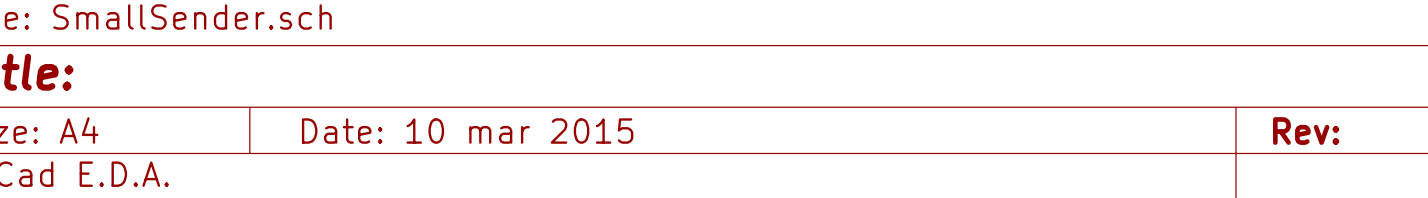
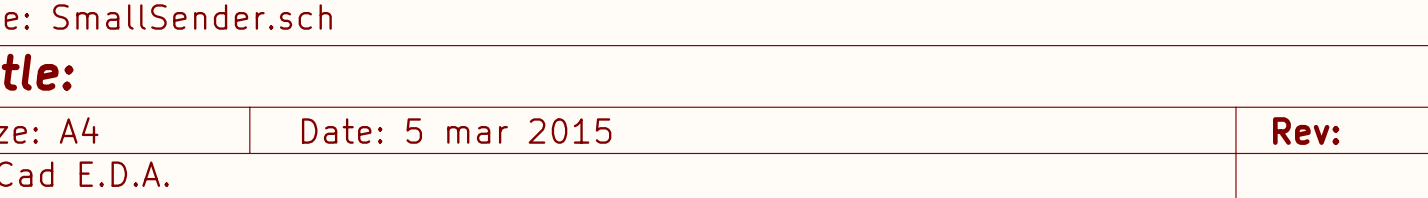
title block: Date: 10 mar 2015 (467, 131) -> Date: 5 mar 2015 (456, 131)

